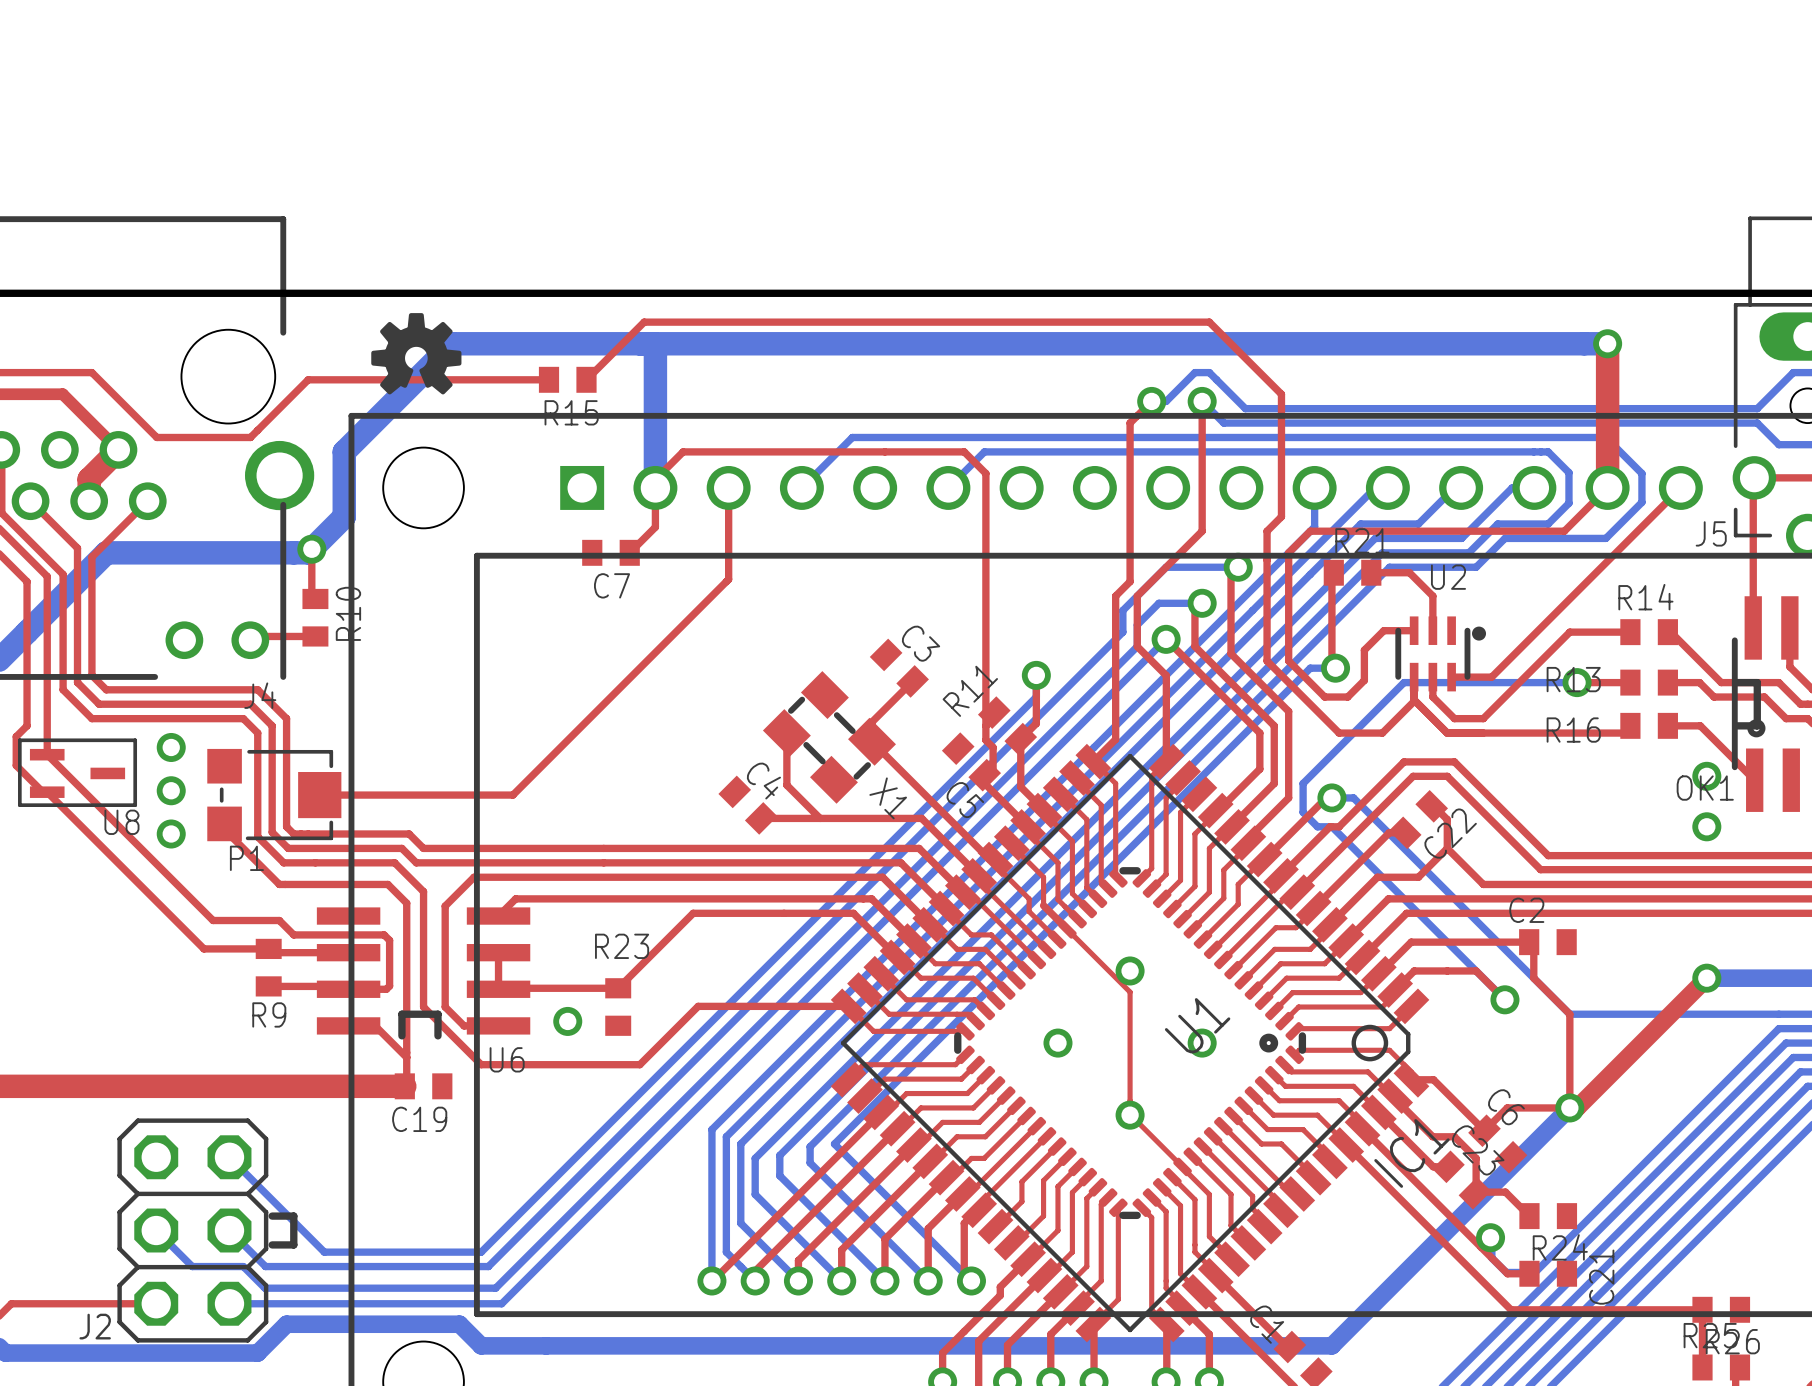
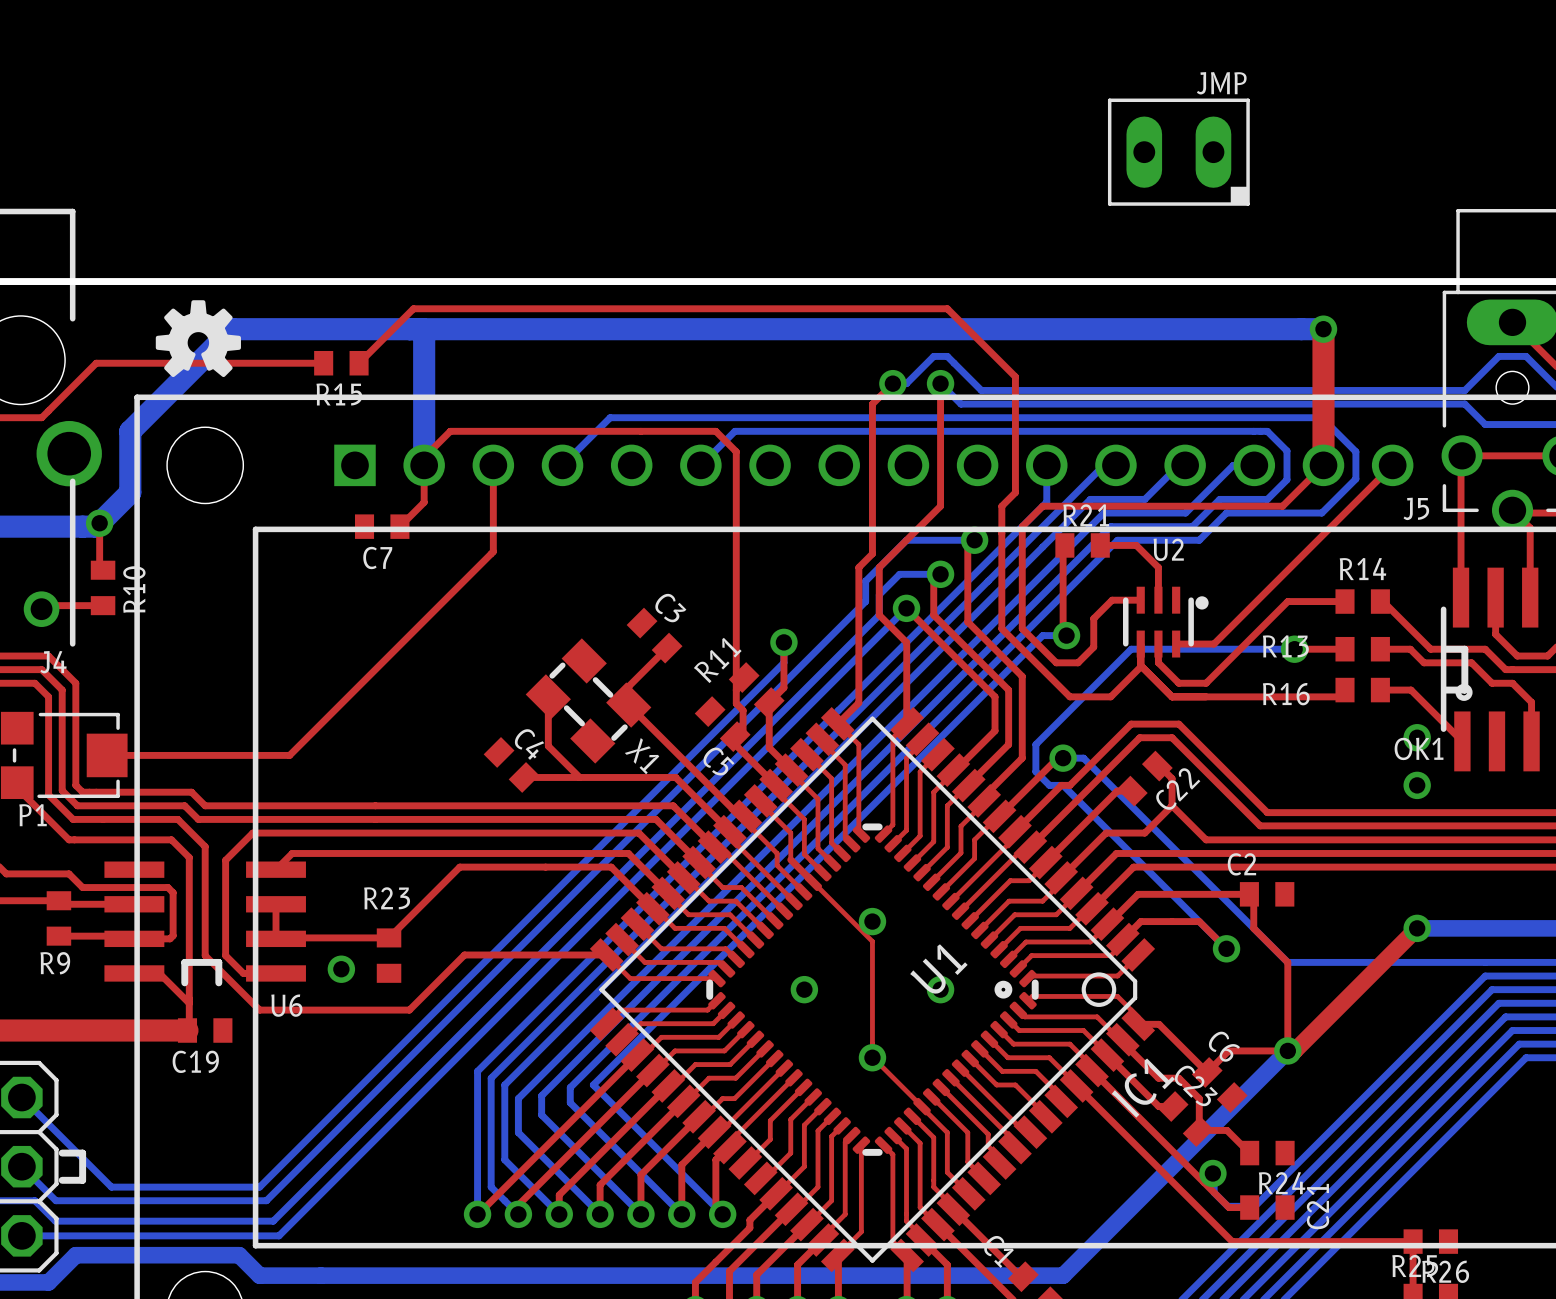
JMP: none -> (1178, 152)

